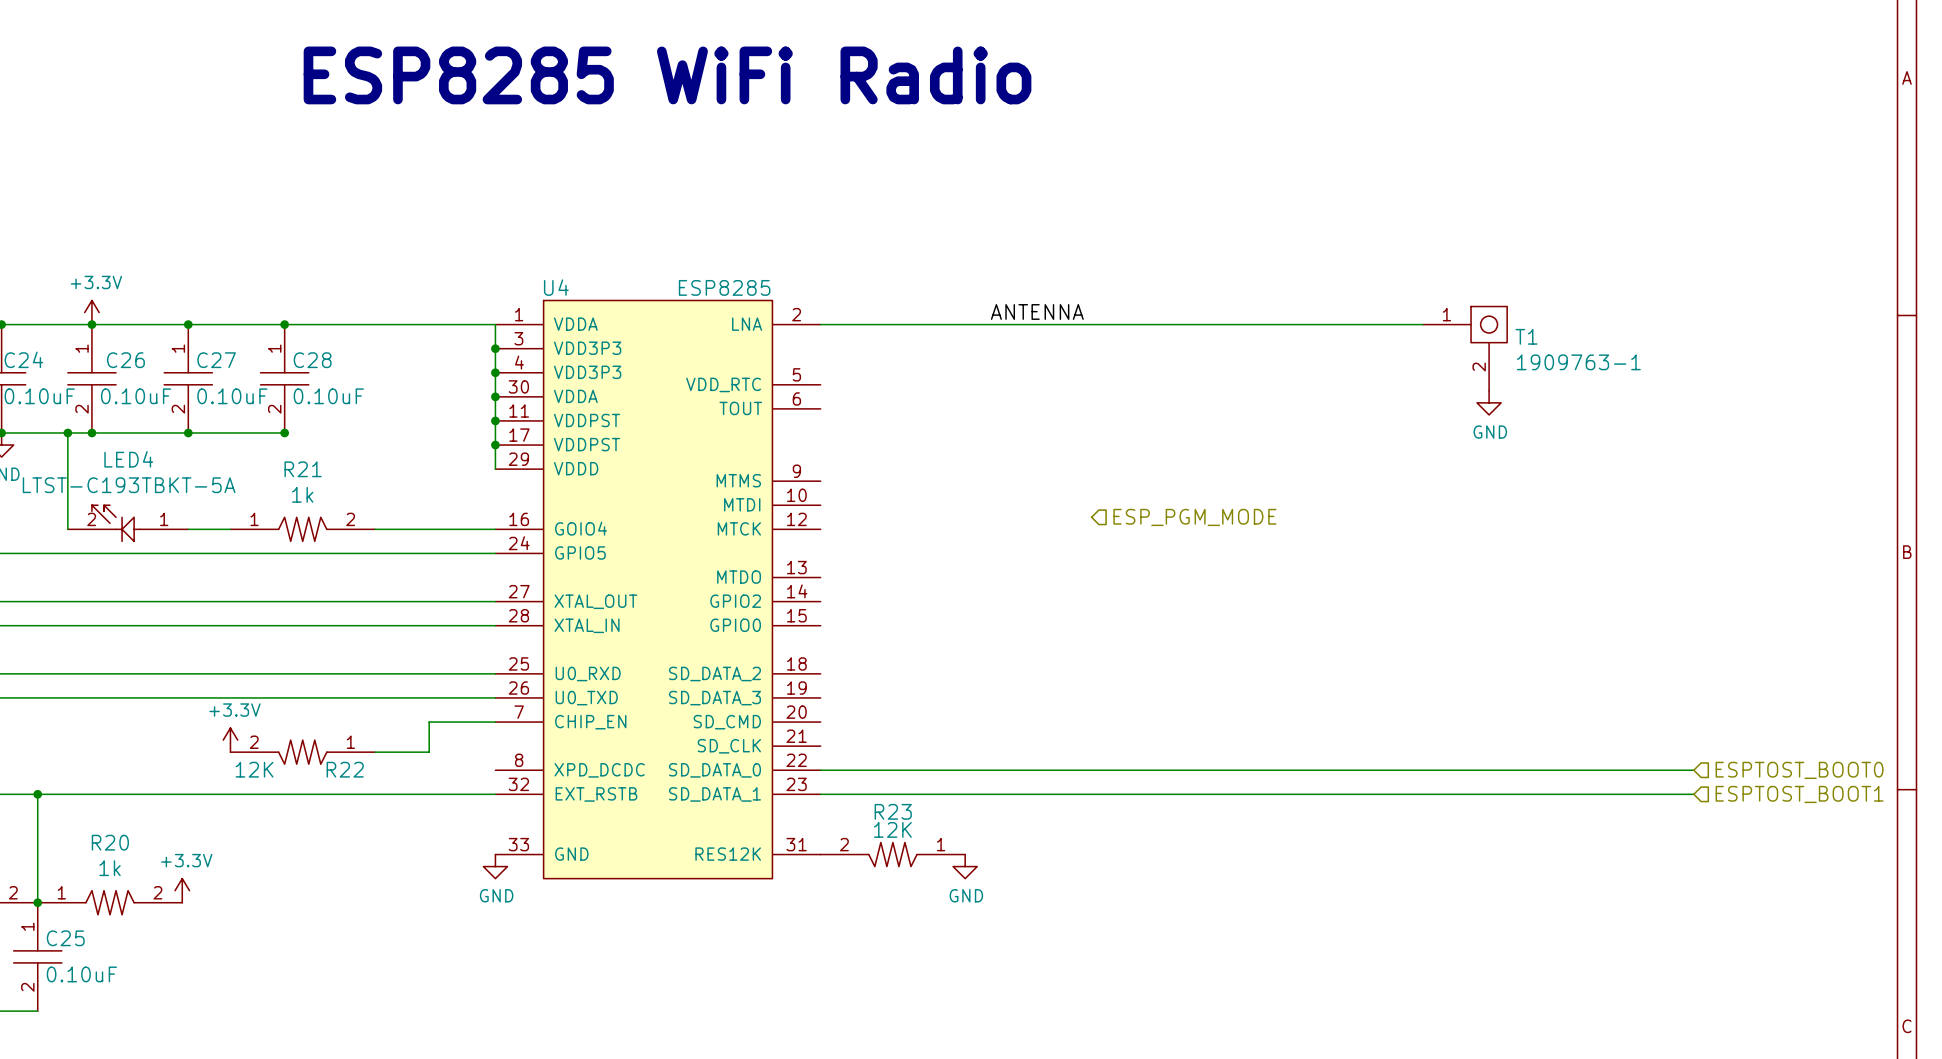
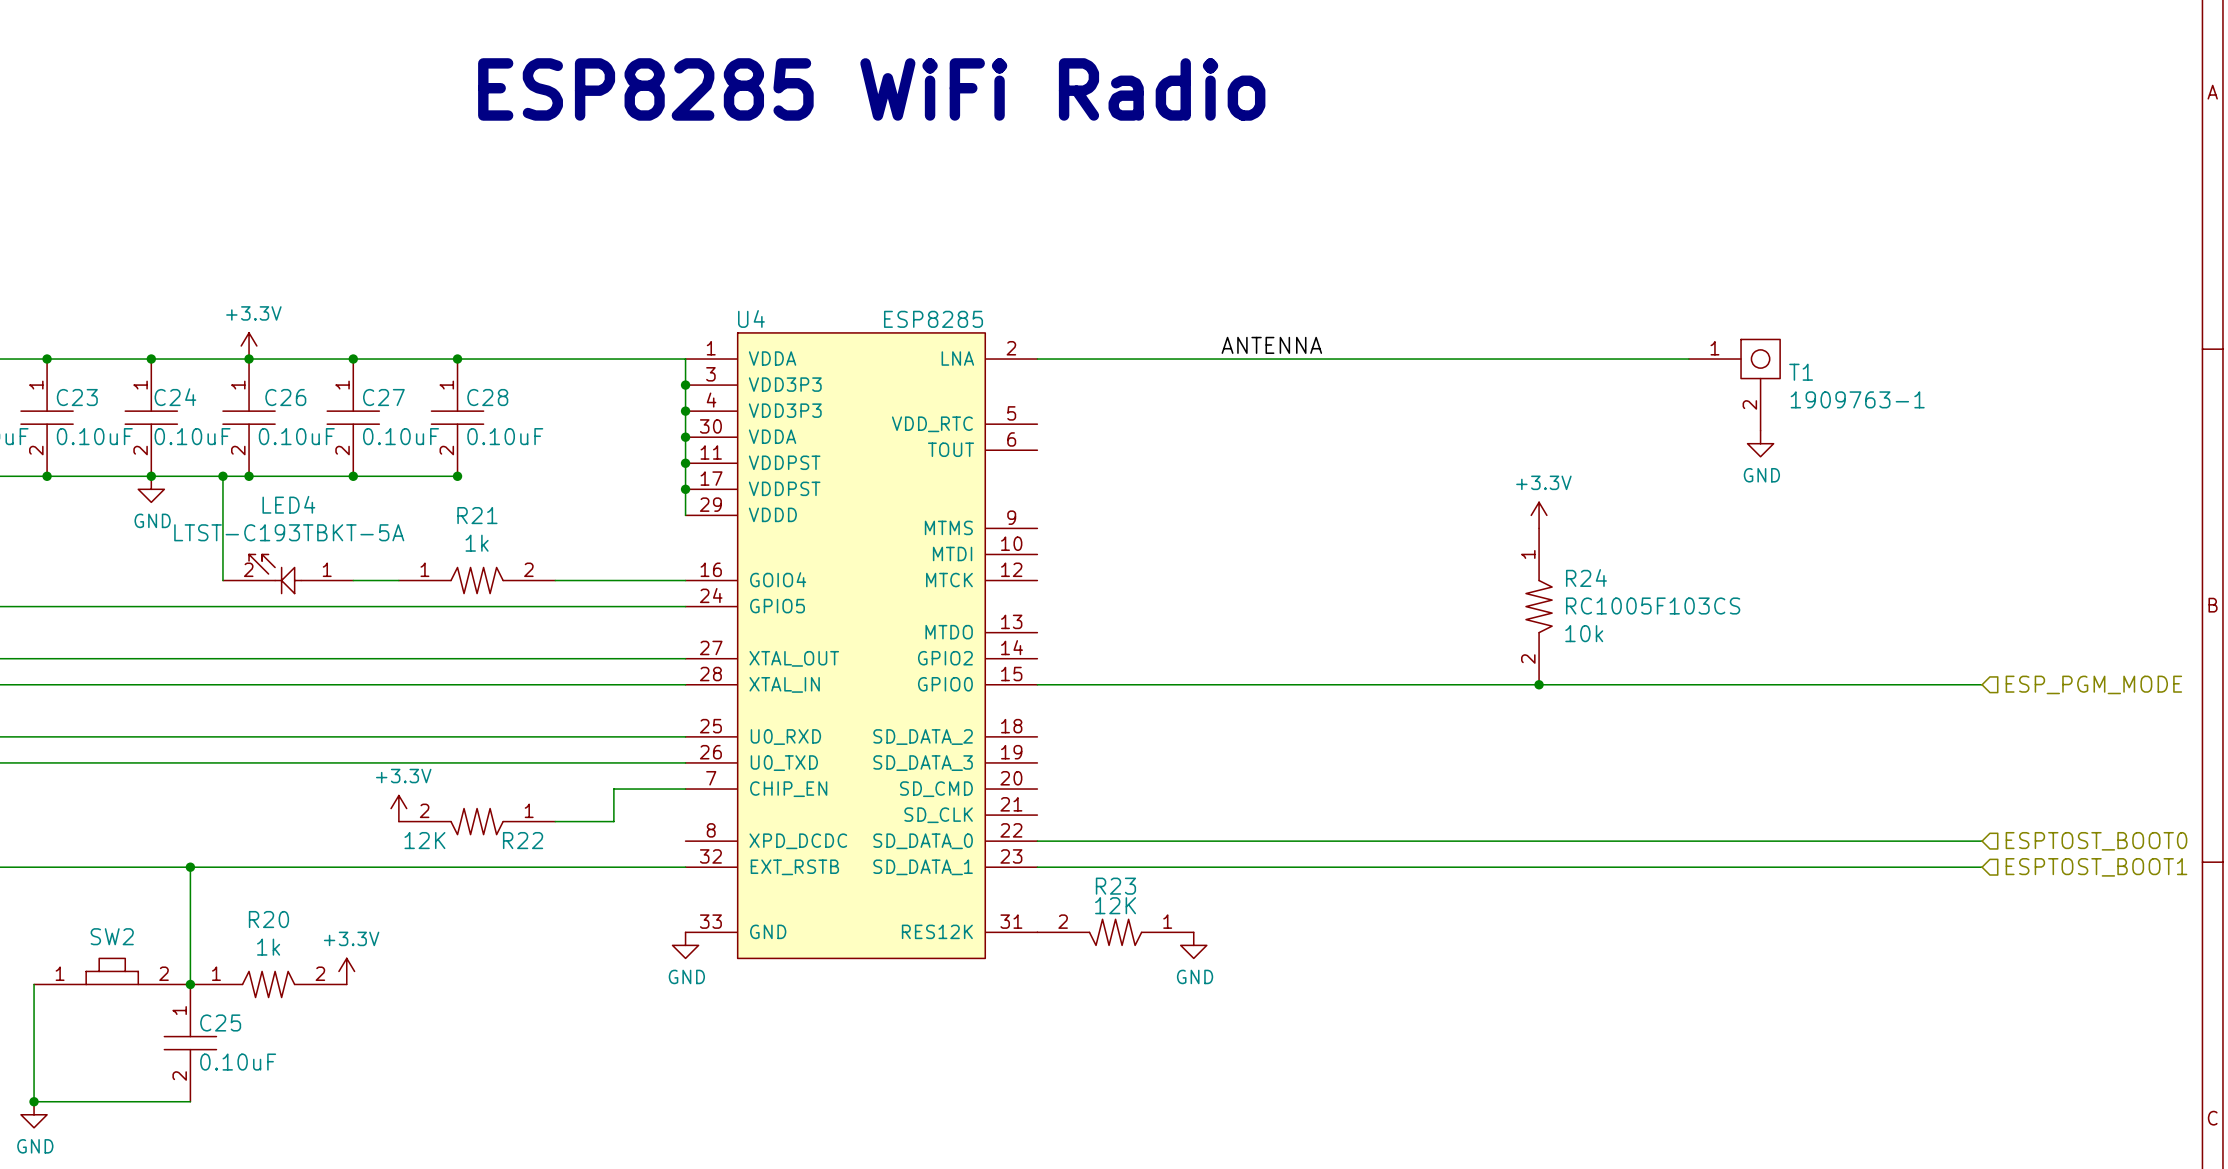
power symbol: none -> +3.3V (1539, 515)
hierarchical label: ESP_PGM_MODE (1194, 517) -> none
R24: none -> RC1005F103CS (1539, 606)
wire: none -> (1037, 684) (1982, 684)
junction: none -> (1539, 684)
hierarchical label: none -> ESP_PGM_MODE (2093, 684)

